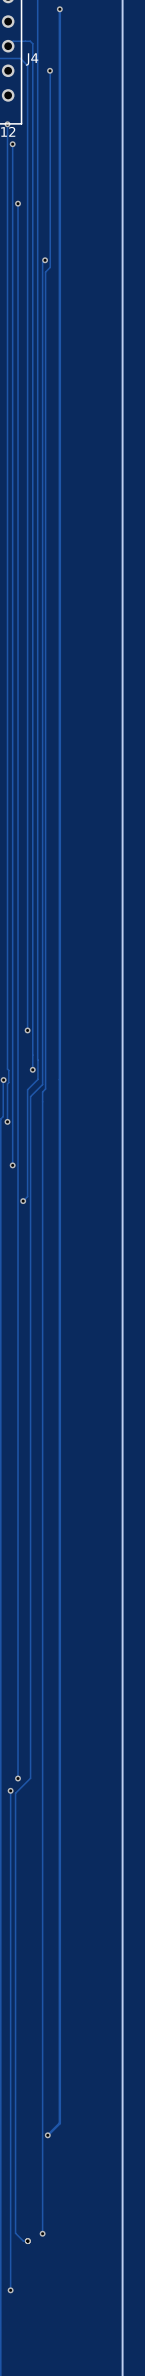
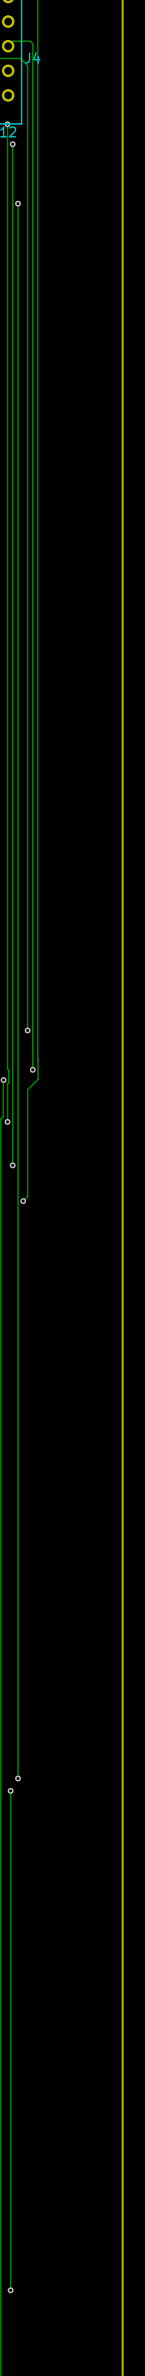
track: (59, 9) (59, 2123) (47, 2135) -> none
via: (59, 9) -> none
track: (50, 70) (50, 267) (45, 272) (45, 1089) (42, 1091) (42, 2233) -> none
via: (50, 70) -> none
track: (45, 260) (42, 262) (42, 1084) (30, 1096) (30, 1778) (15, 1793) (15, 2233) (23, 2241) (27, 2241) -> none
via: (45, 260) -> none
via: (47, 2135) -> none
via: (42, 2233) -> none
via: (27, 2241) -> none

